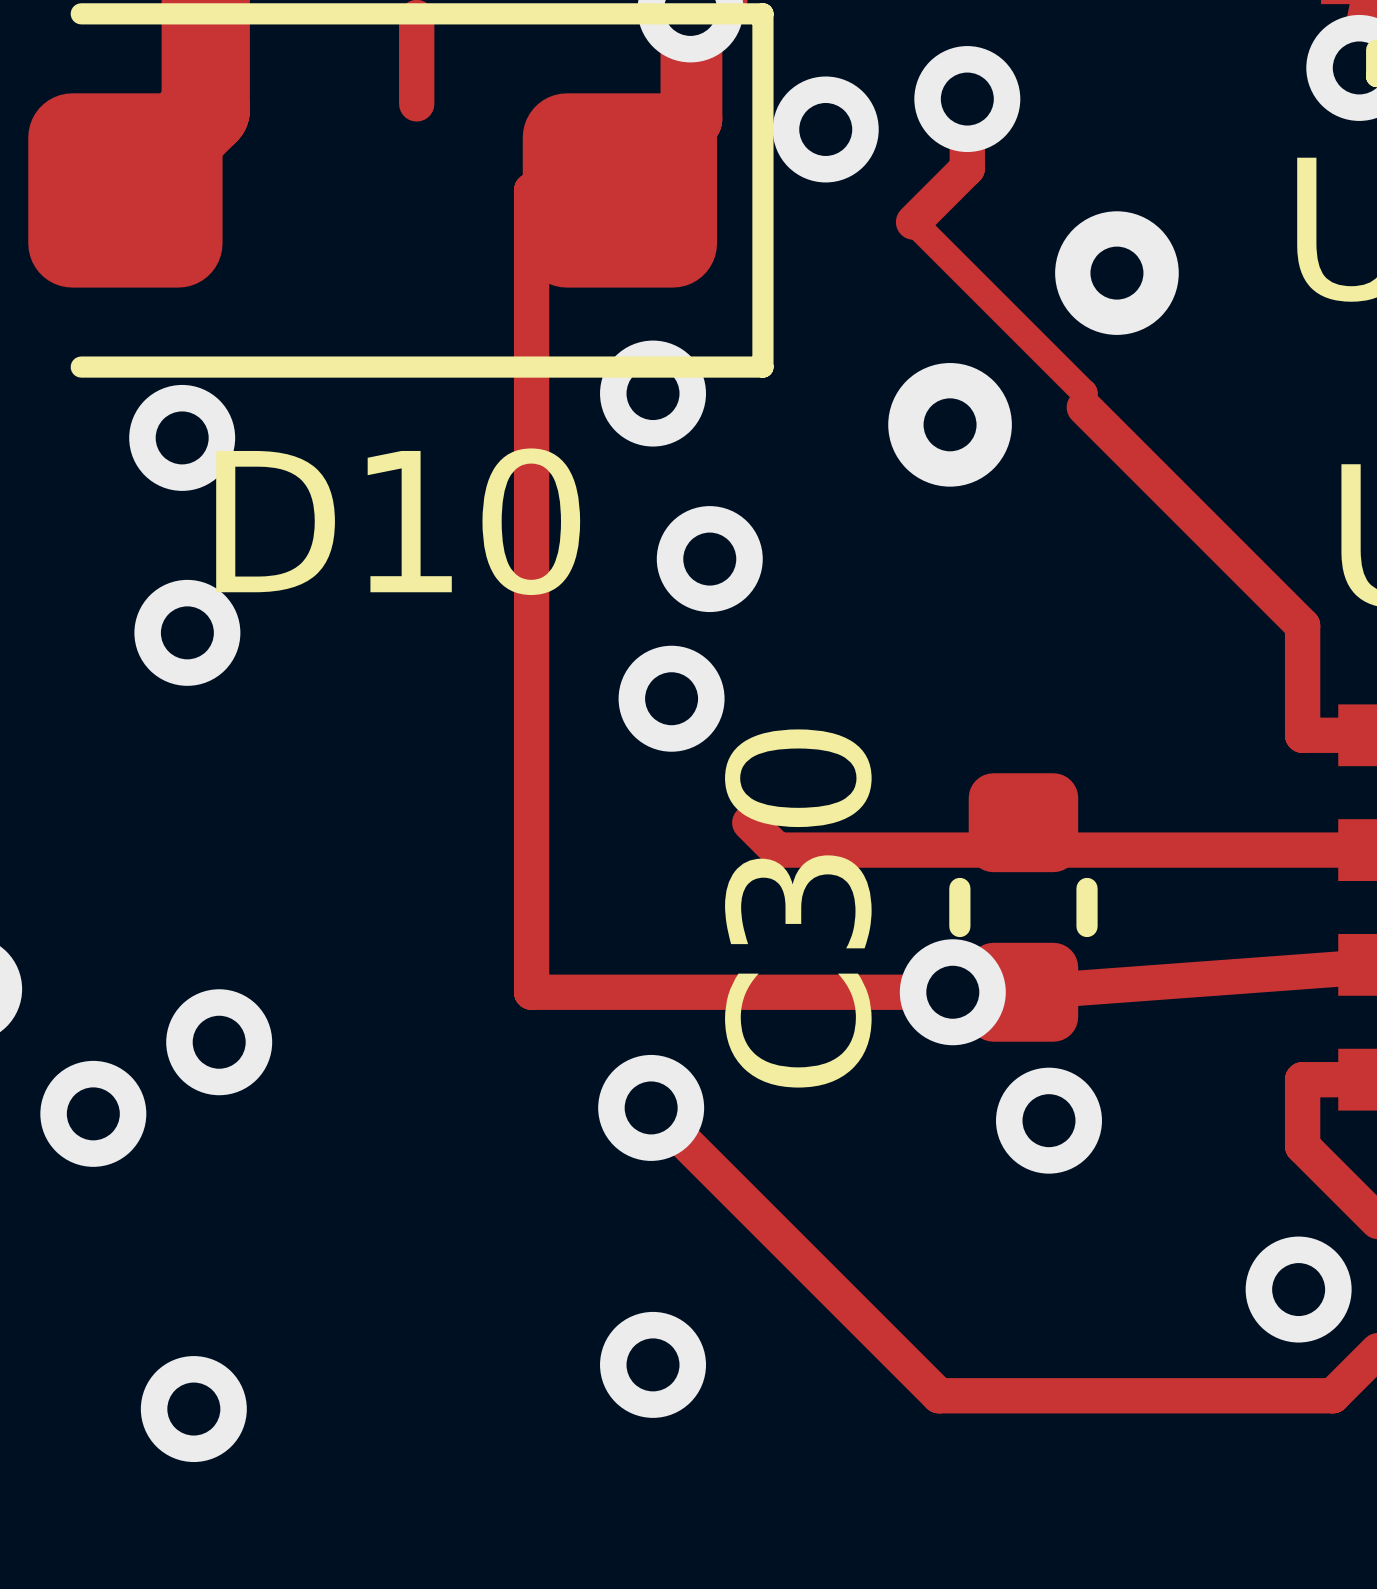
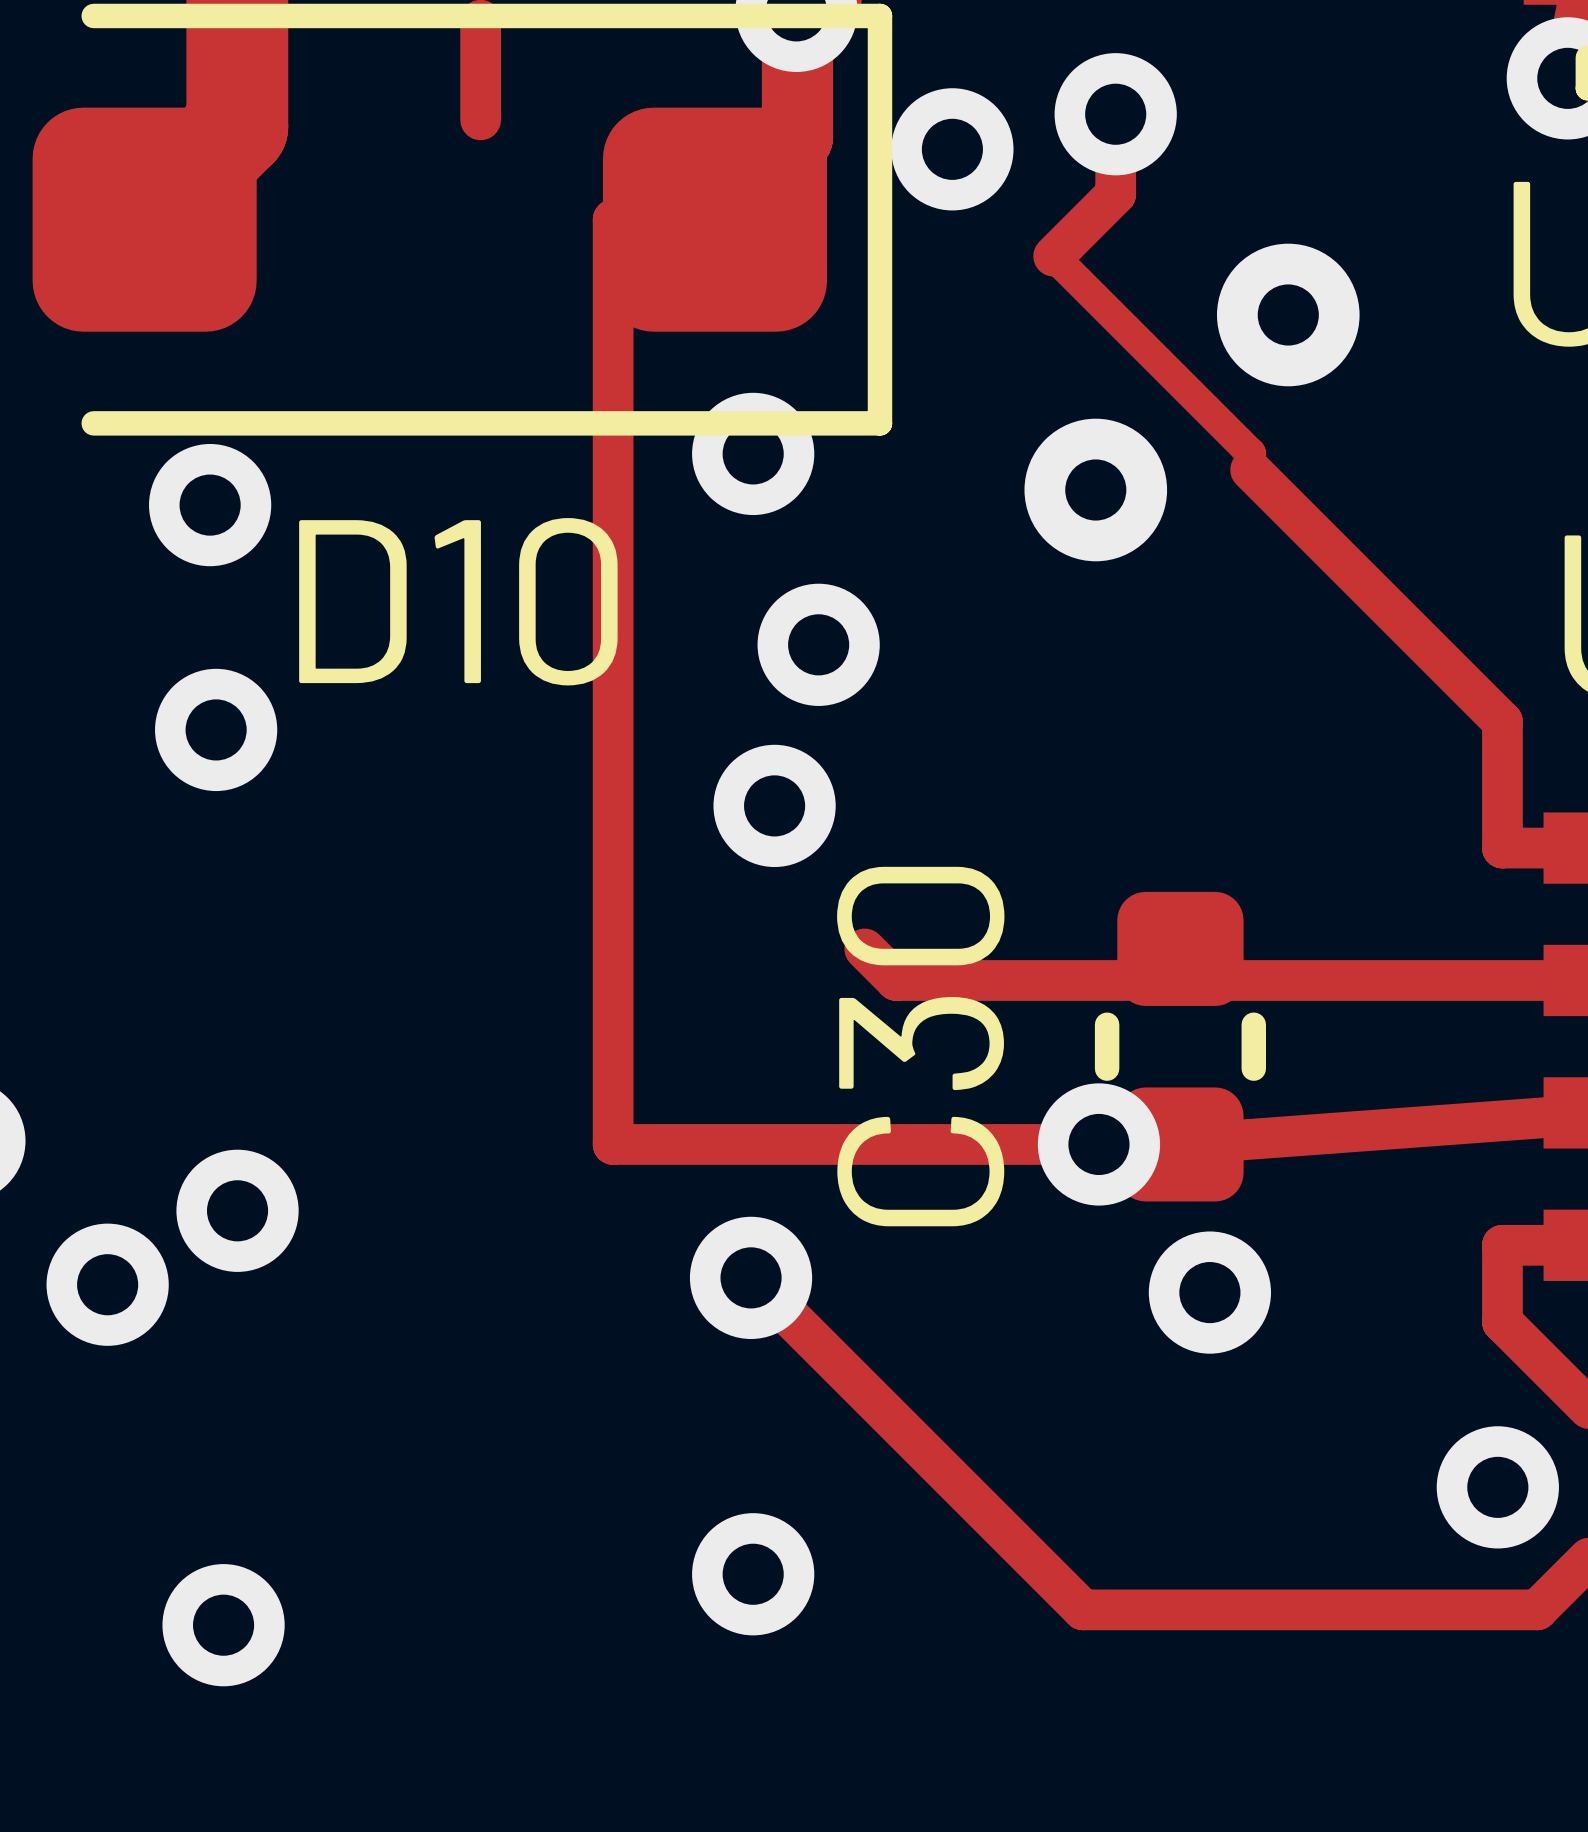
via position: (219, 1042) -> (237, 1210)

